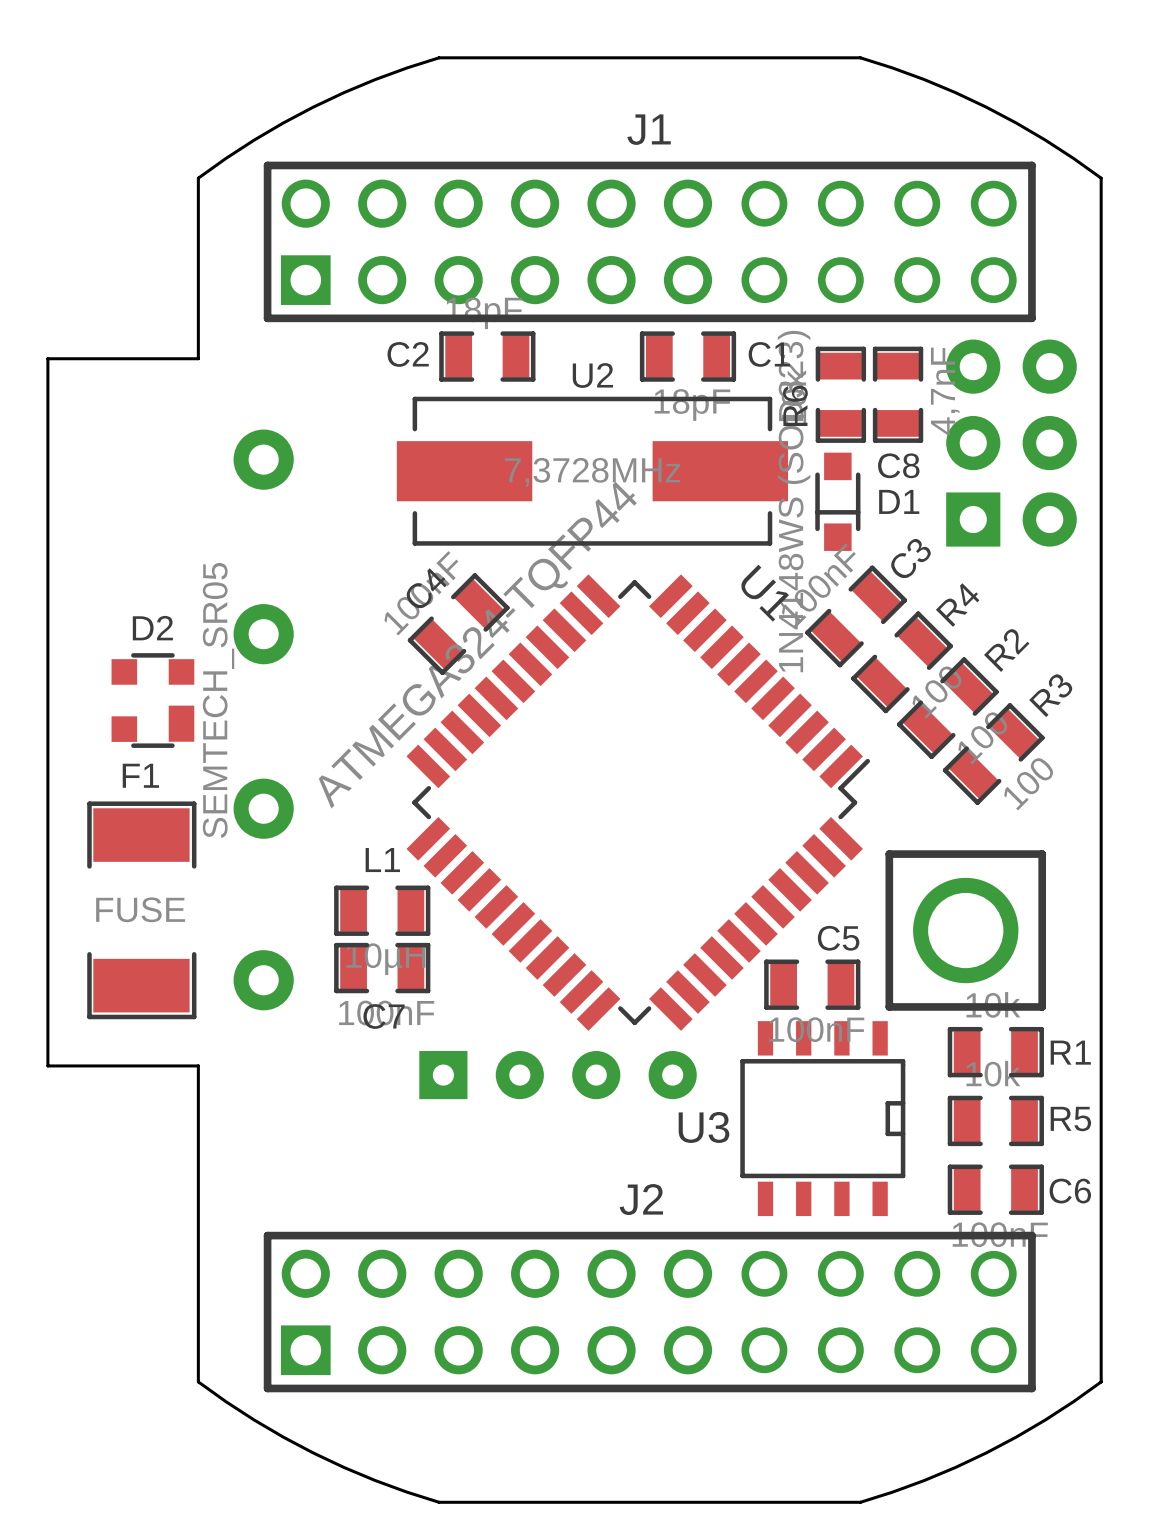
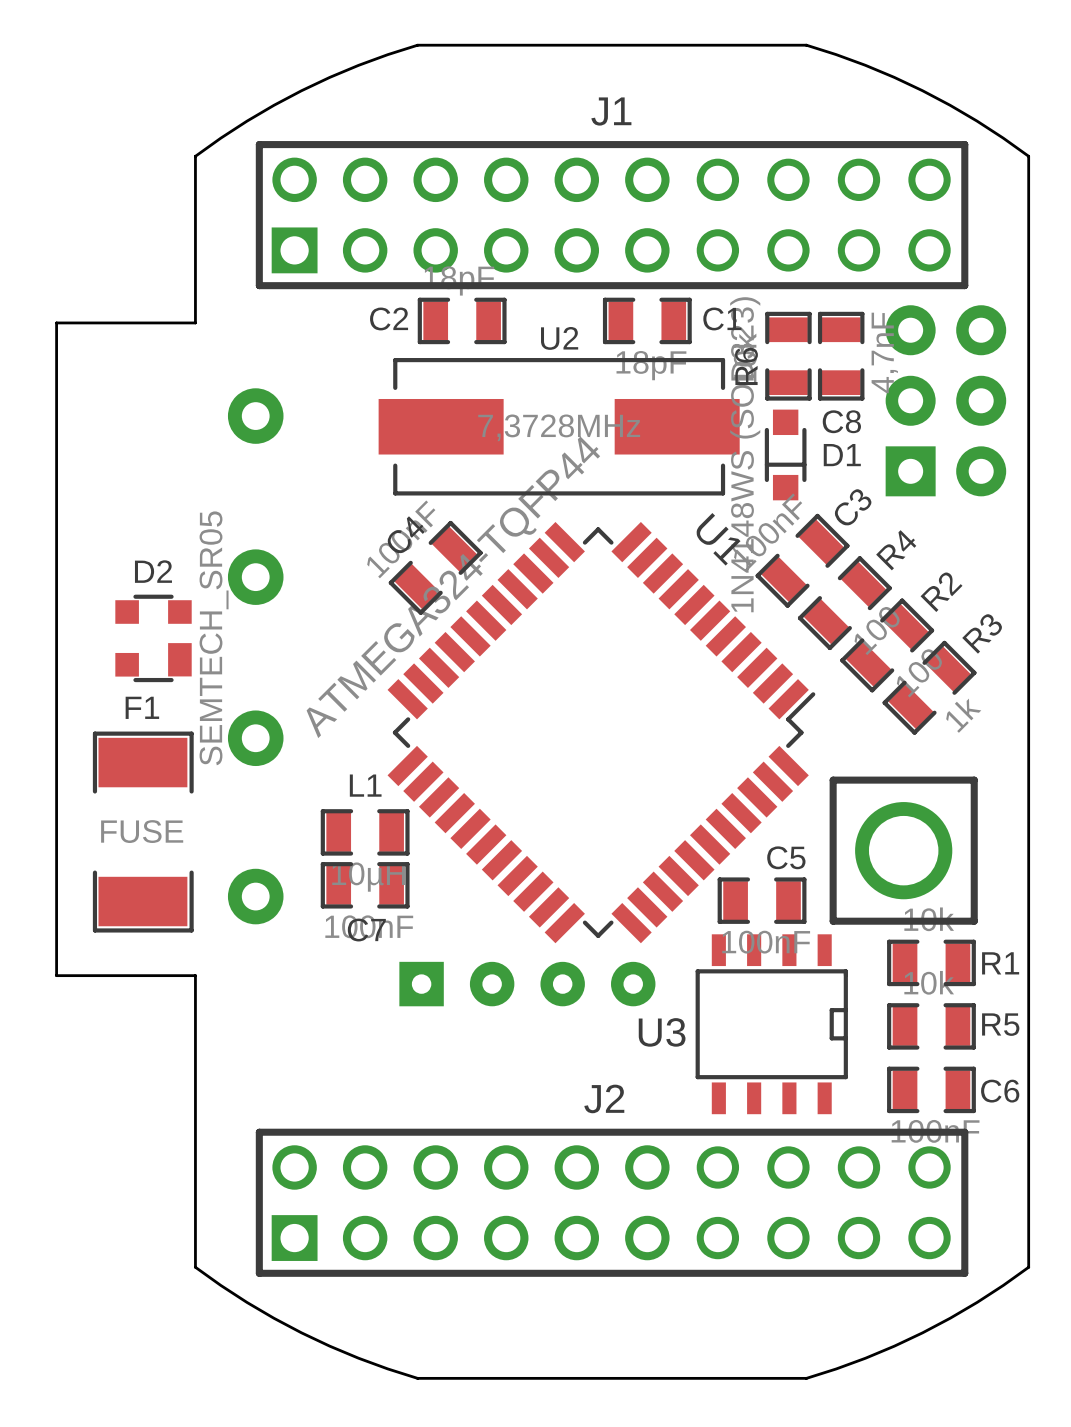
R3 value: 100 (1028, 783) -> 1k (963, 715)

